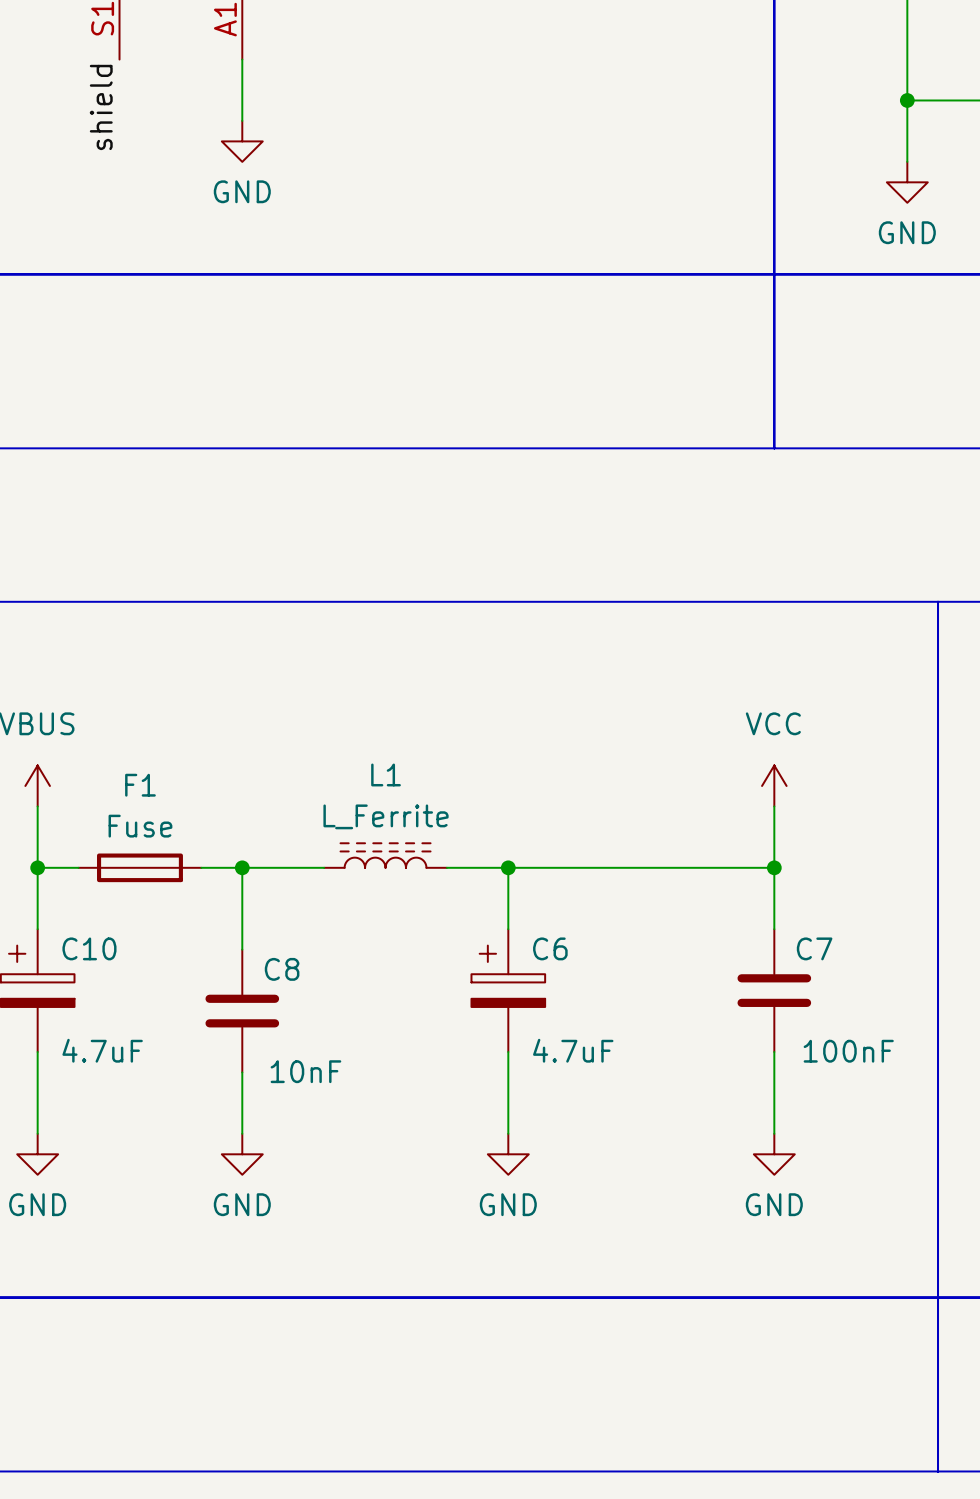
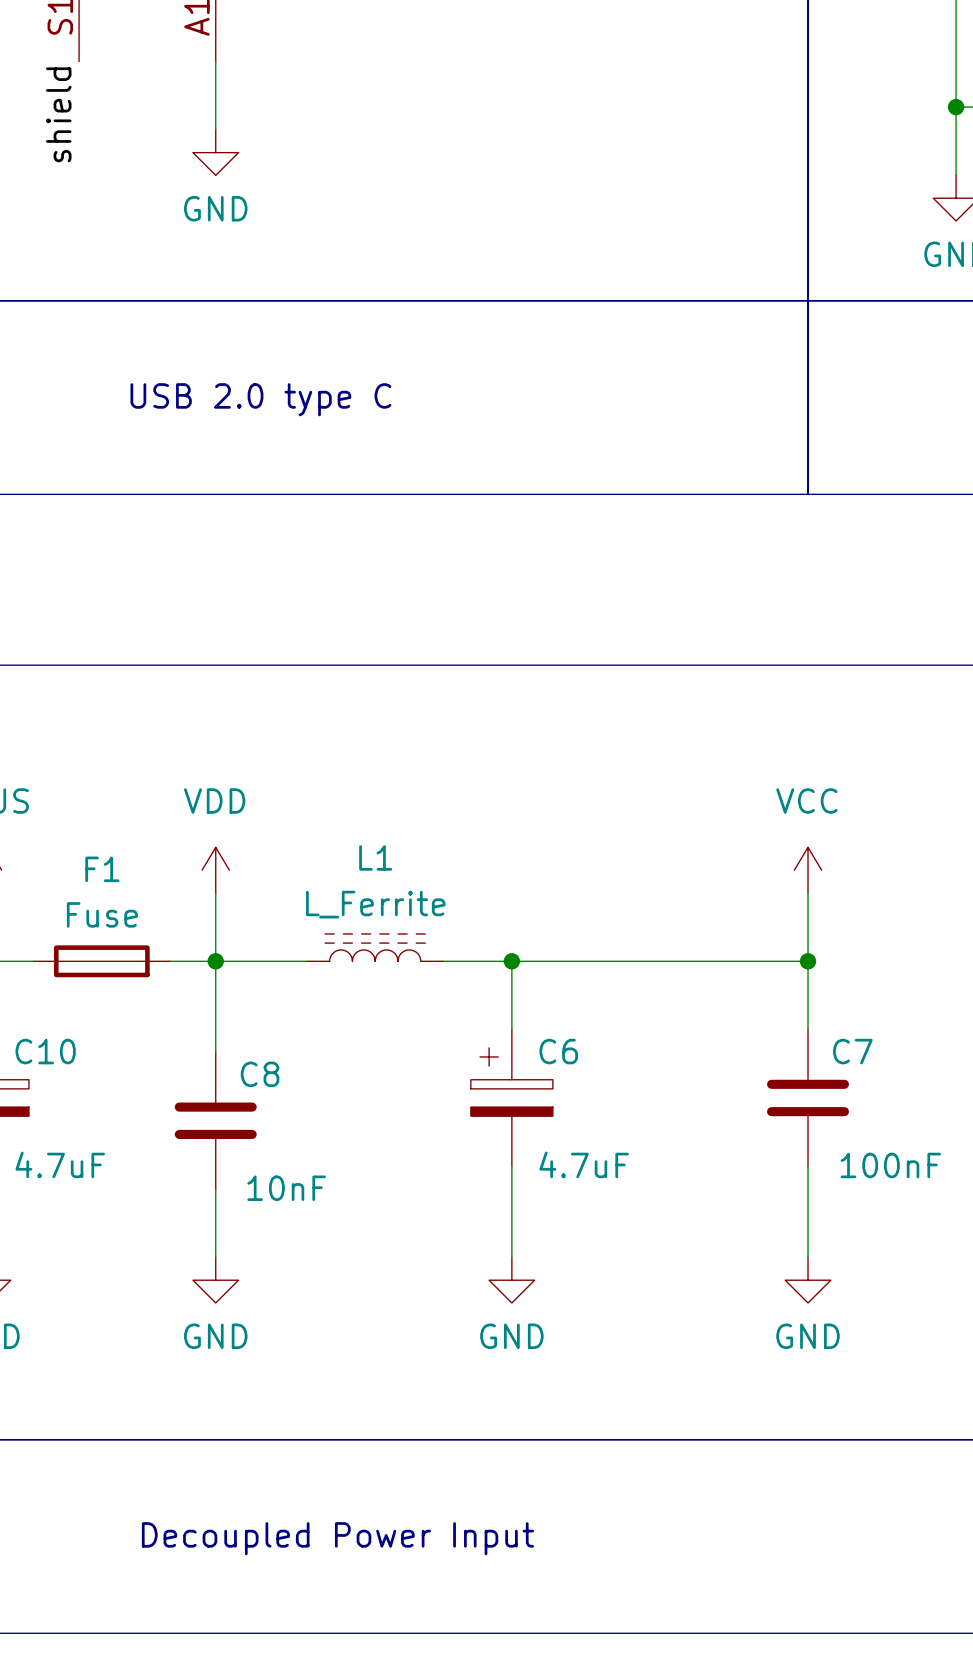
text: none -> USB 2.0 type C (260, 399)
power symbol: none -> VDD (215, 870)
wire: none -> (215, 892) (215, 961)
text: none -> Decoupled Power Input (337, 1538)

